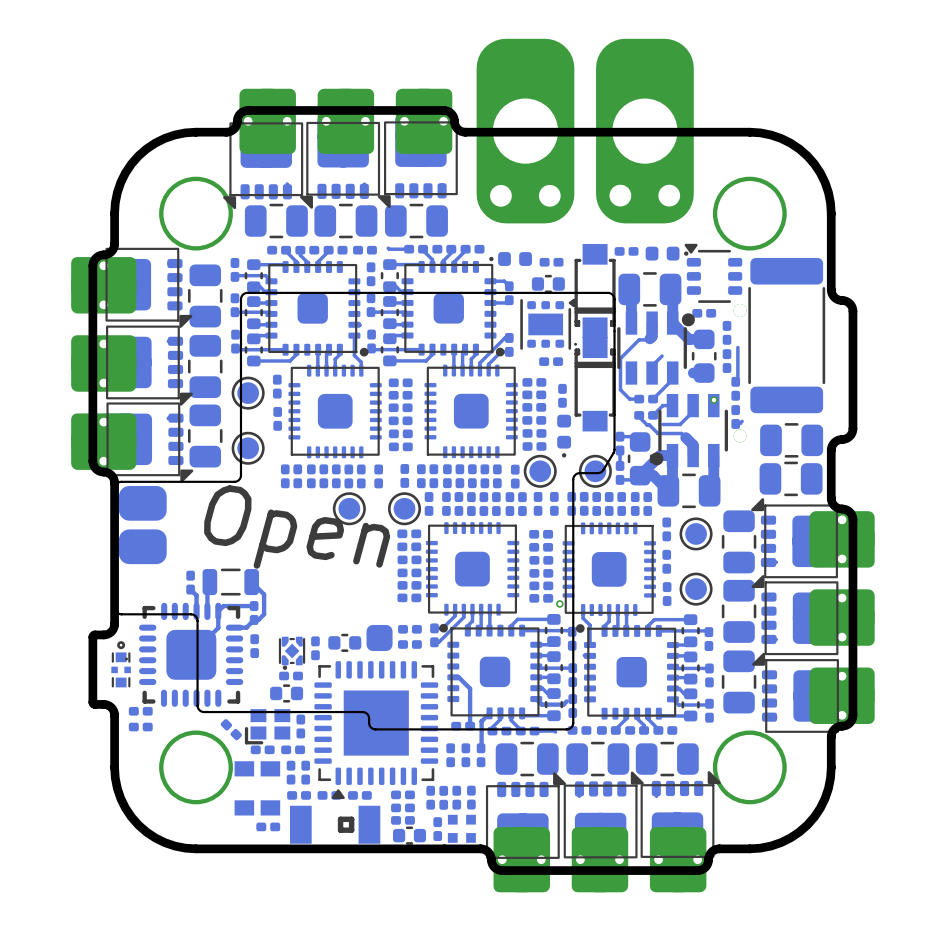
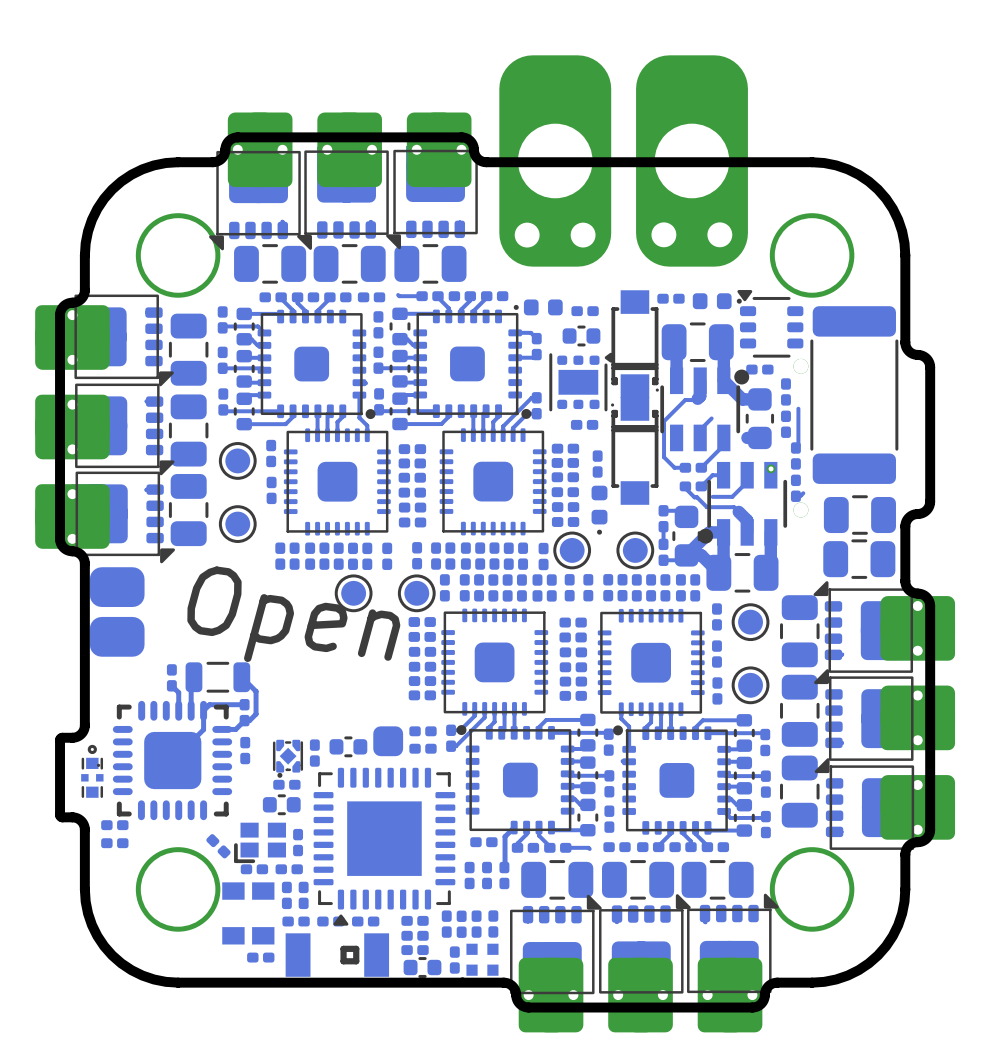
board edge: (608, 292) (244, 293) (240, 299) (240, 477) (234, 481) (121, 481) (116, 483) (115, 488) (115, 611) (120, 614) (191, 614) (196, 616) (197, 705) (202, 711) (363, 712) (368, 716) (370, 726) (375, 729) (569, 728) (573, 722) (573, 478) (578, 473) (601, 471) (614, 450) (614, 299) (612, 294) (608, 292) -> none
via: (559, 603) -> none
track: (453, 677) (458, 677) (470, 688) (470, 722) -> none
track: (536, 699) (541, 704) (563, 704) (566, 701) -> none

